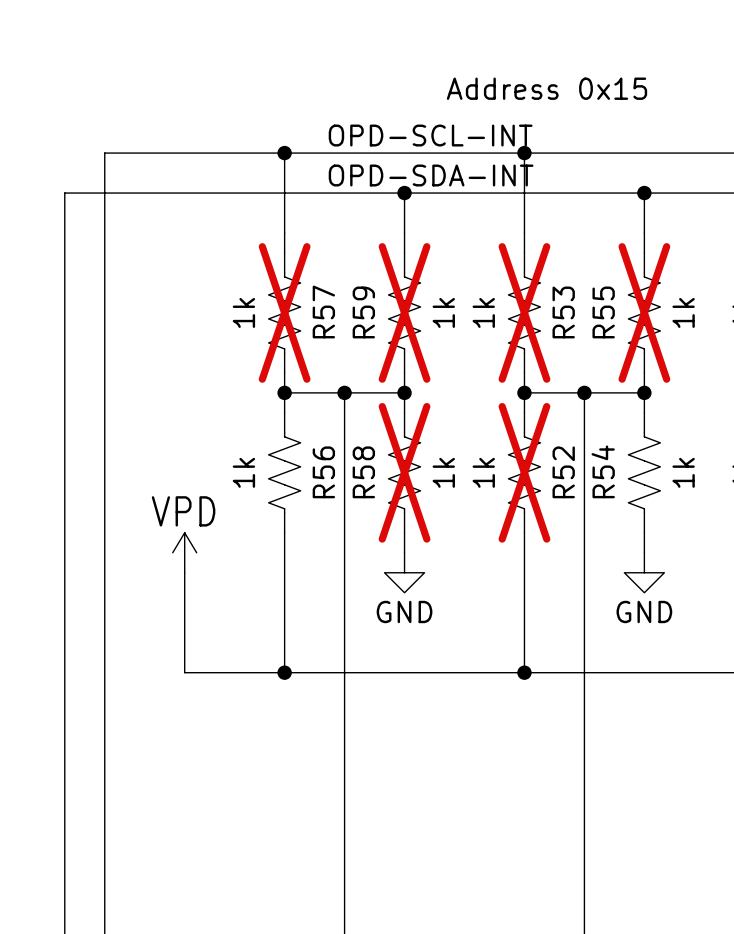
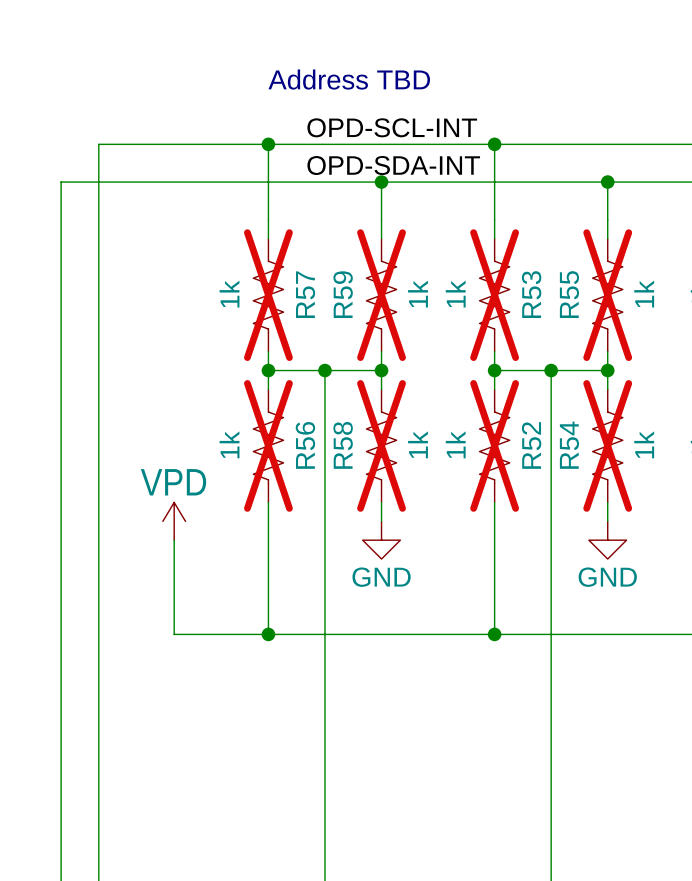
text: Address 0x15 (546, 88) -> Address TBD (349, 79)
R56 do-not-place cross: none -> (268, 445)
R54 do-not-place cross: none -> (607, 445)

